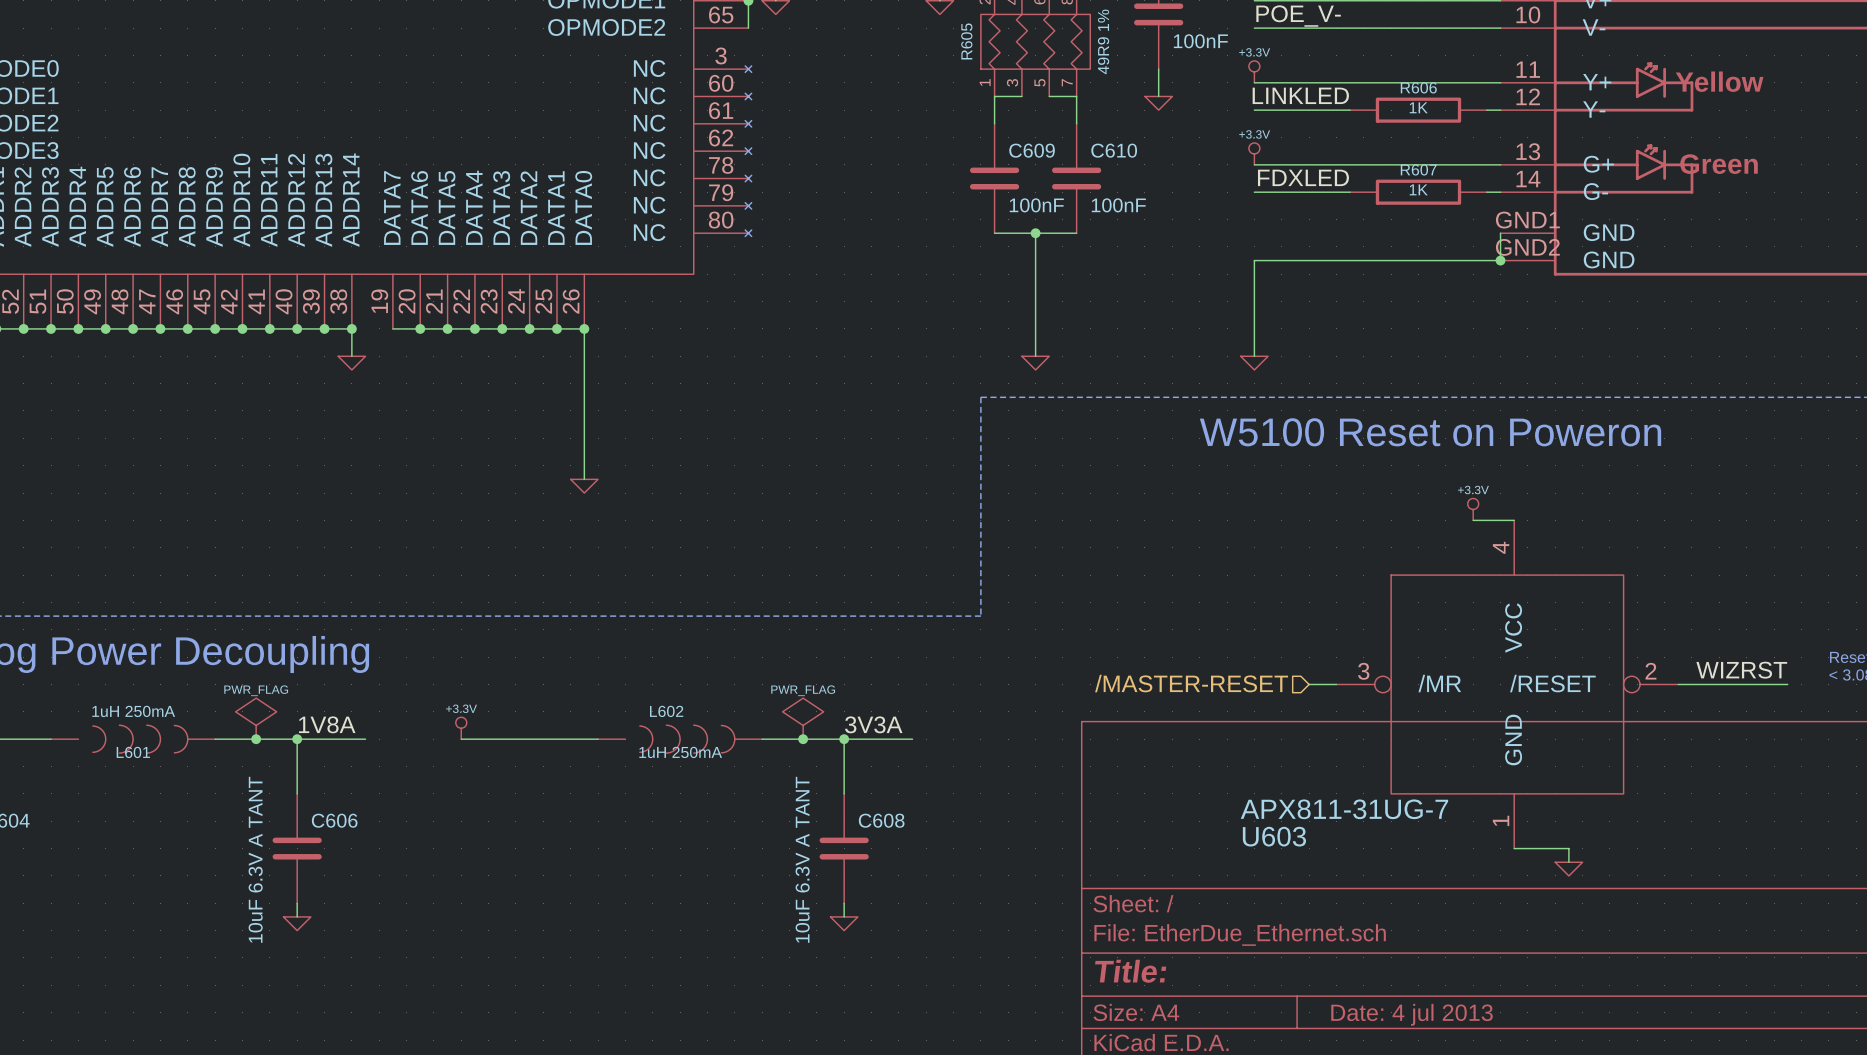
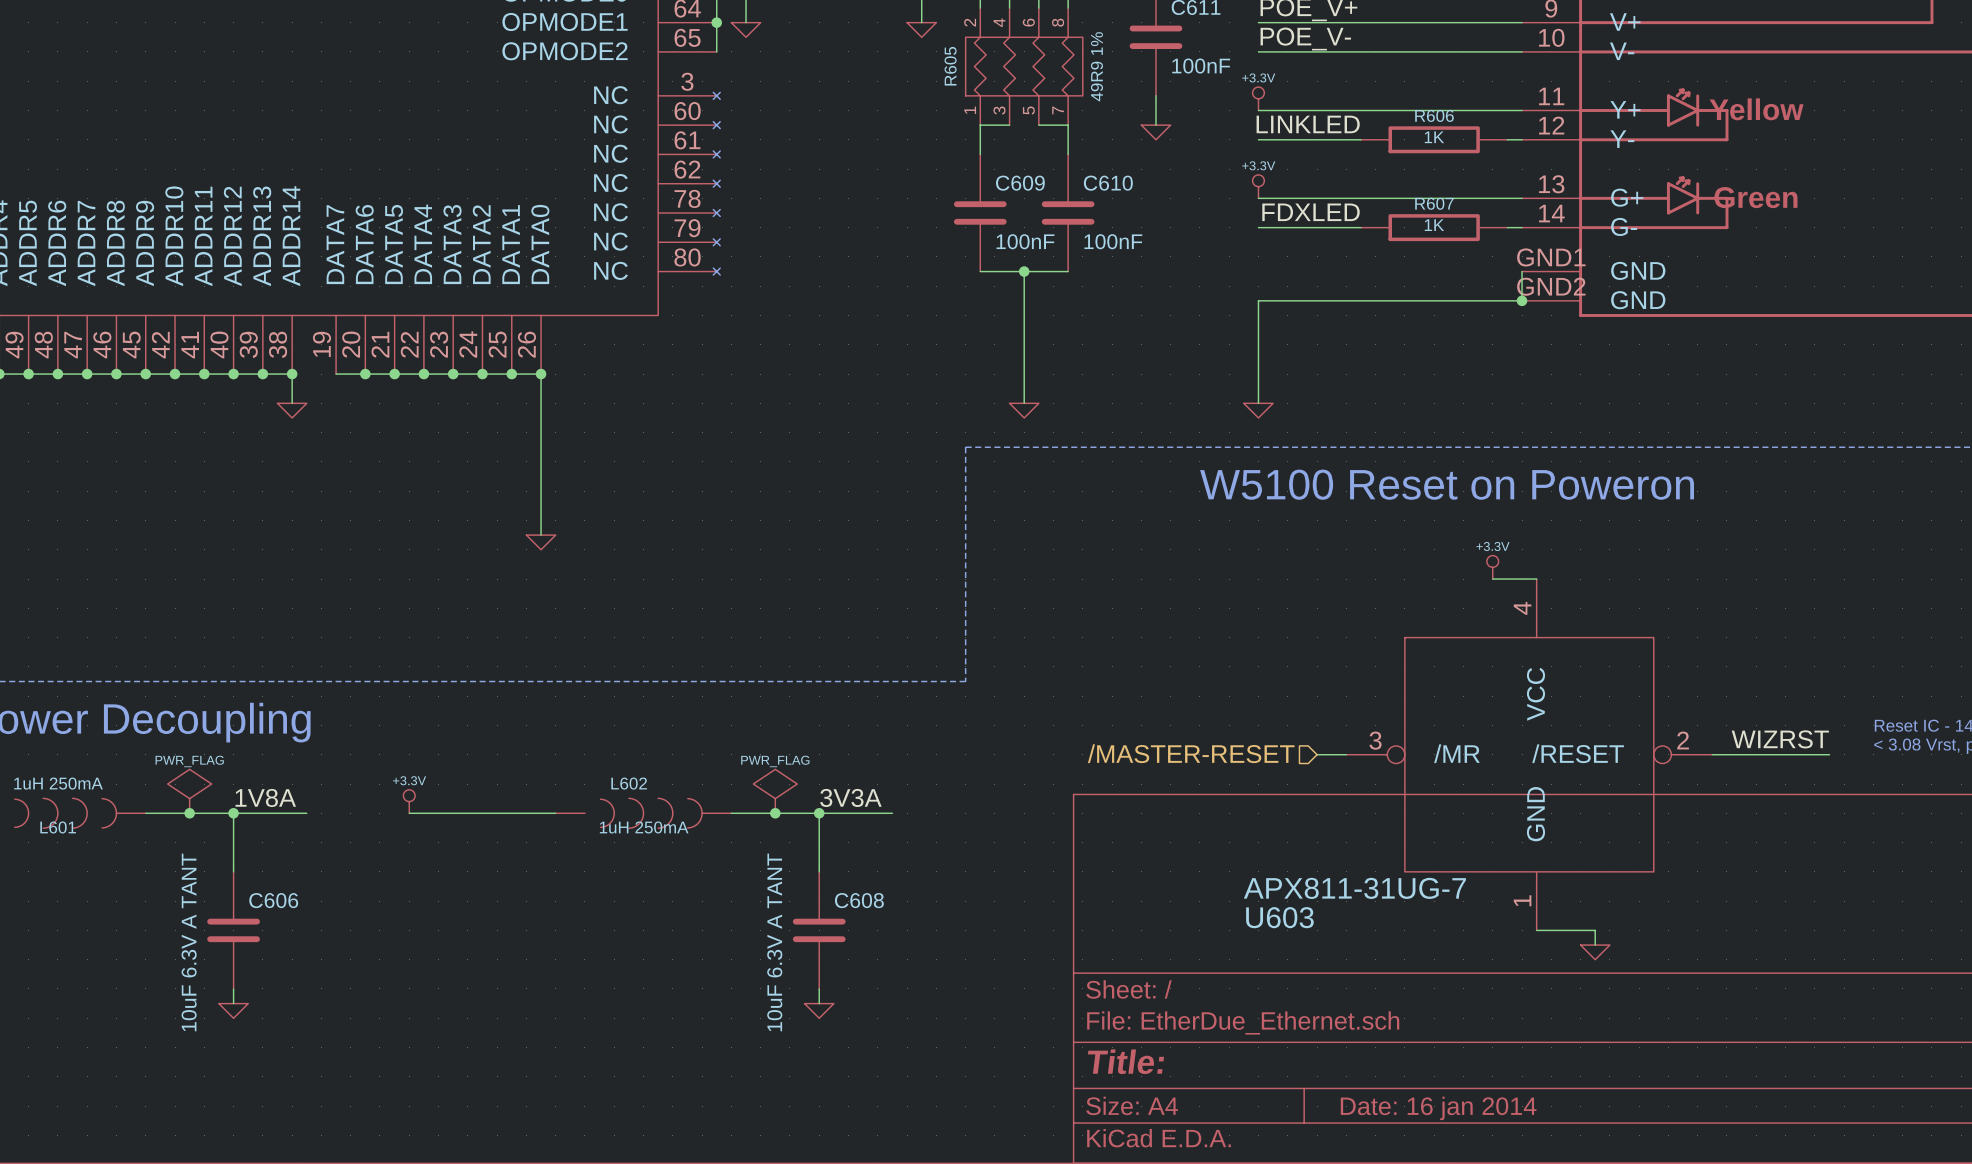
title block: Date: 4 jul 2013 (1412, 1014) -> Date: 16 jan 2014 (1438, 1108)

